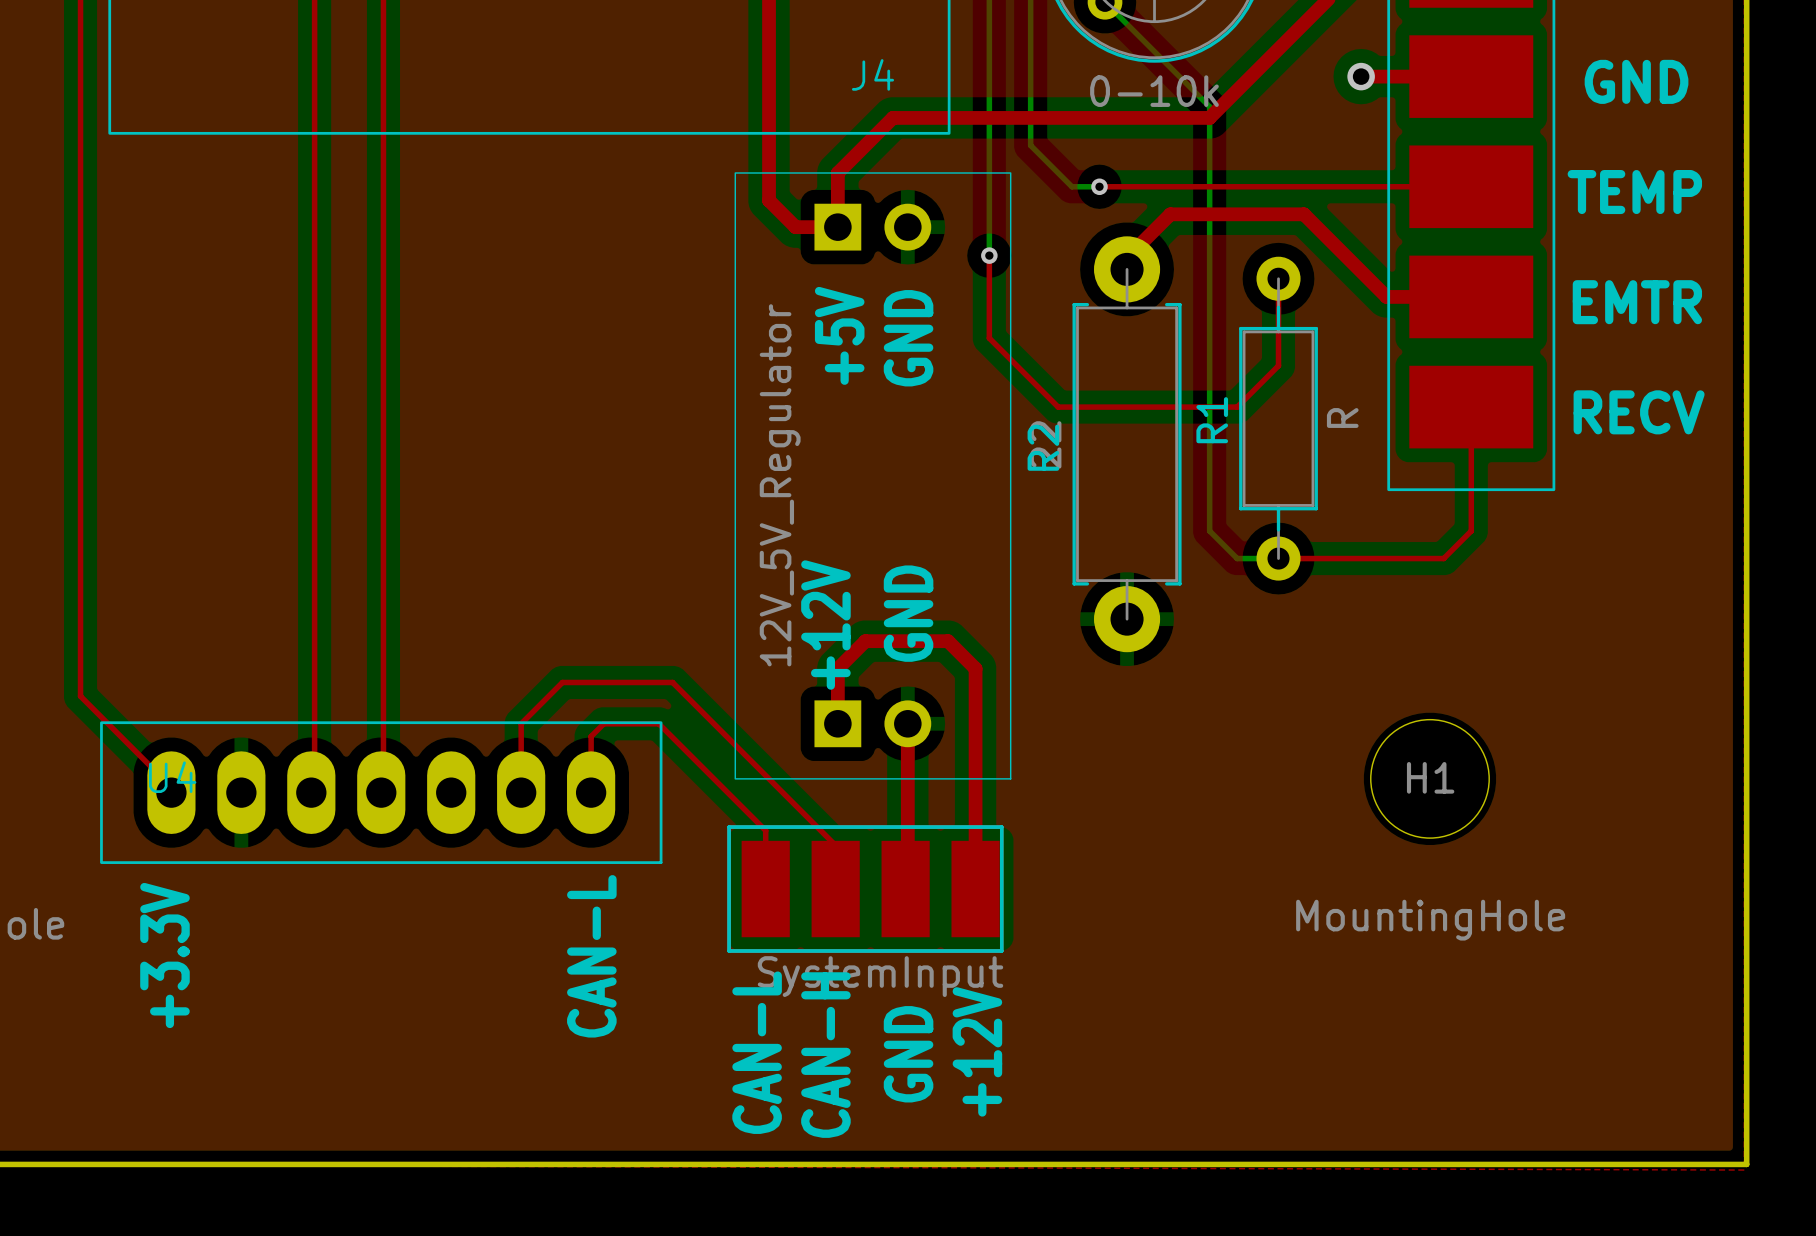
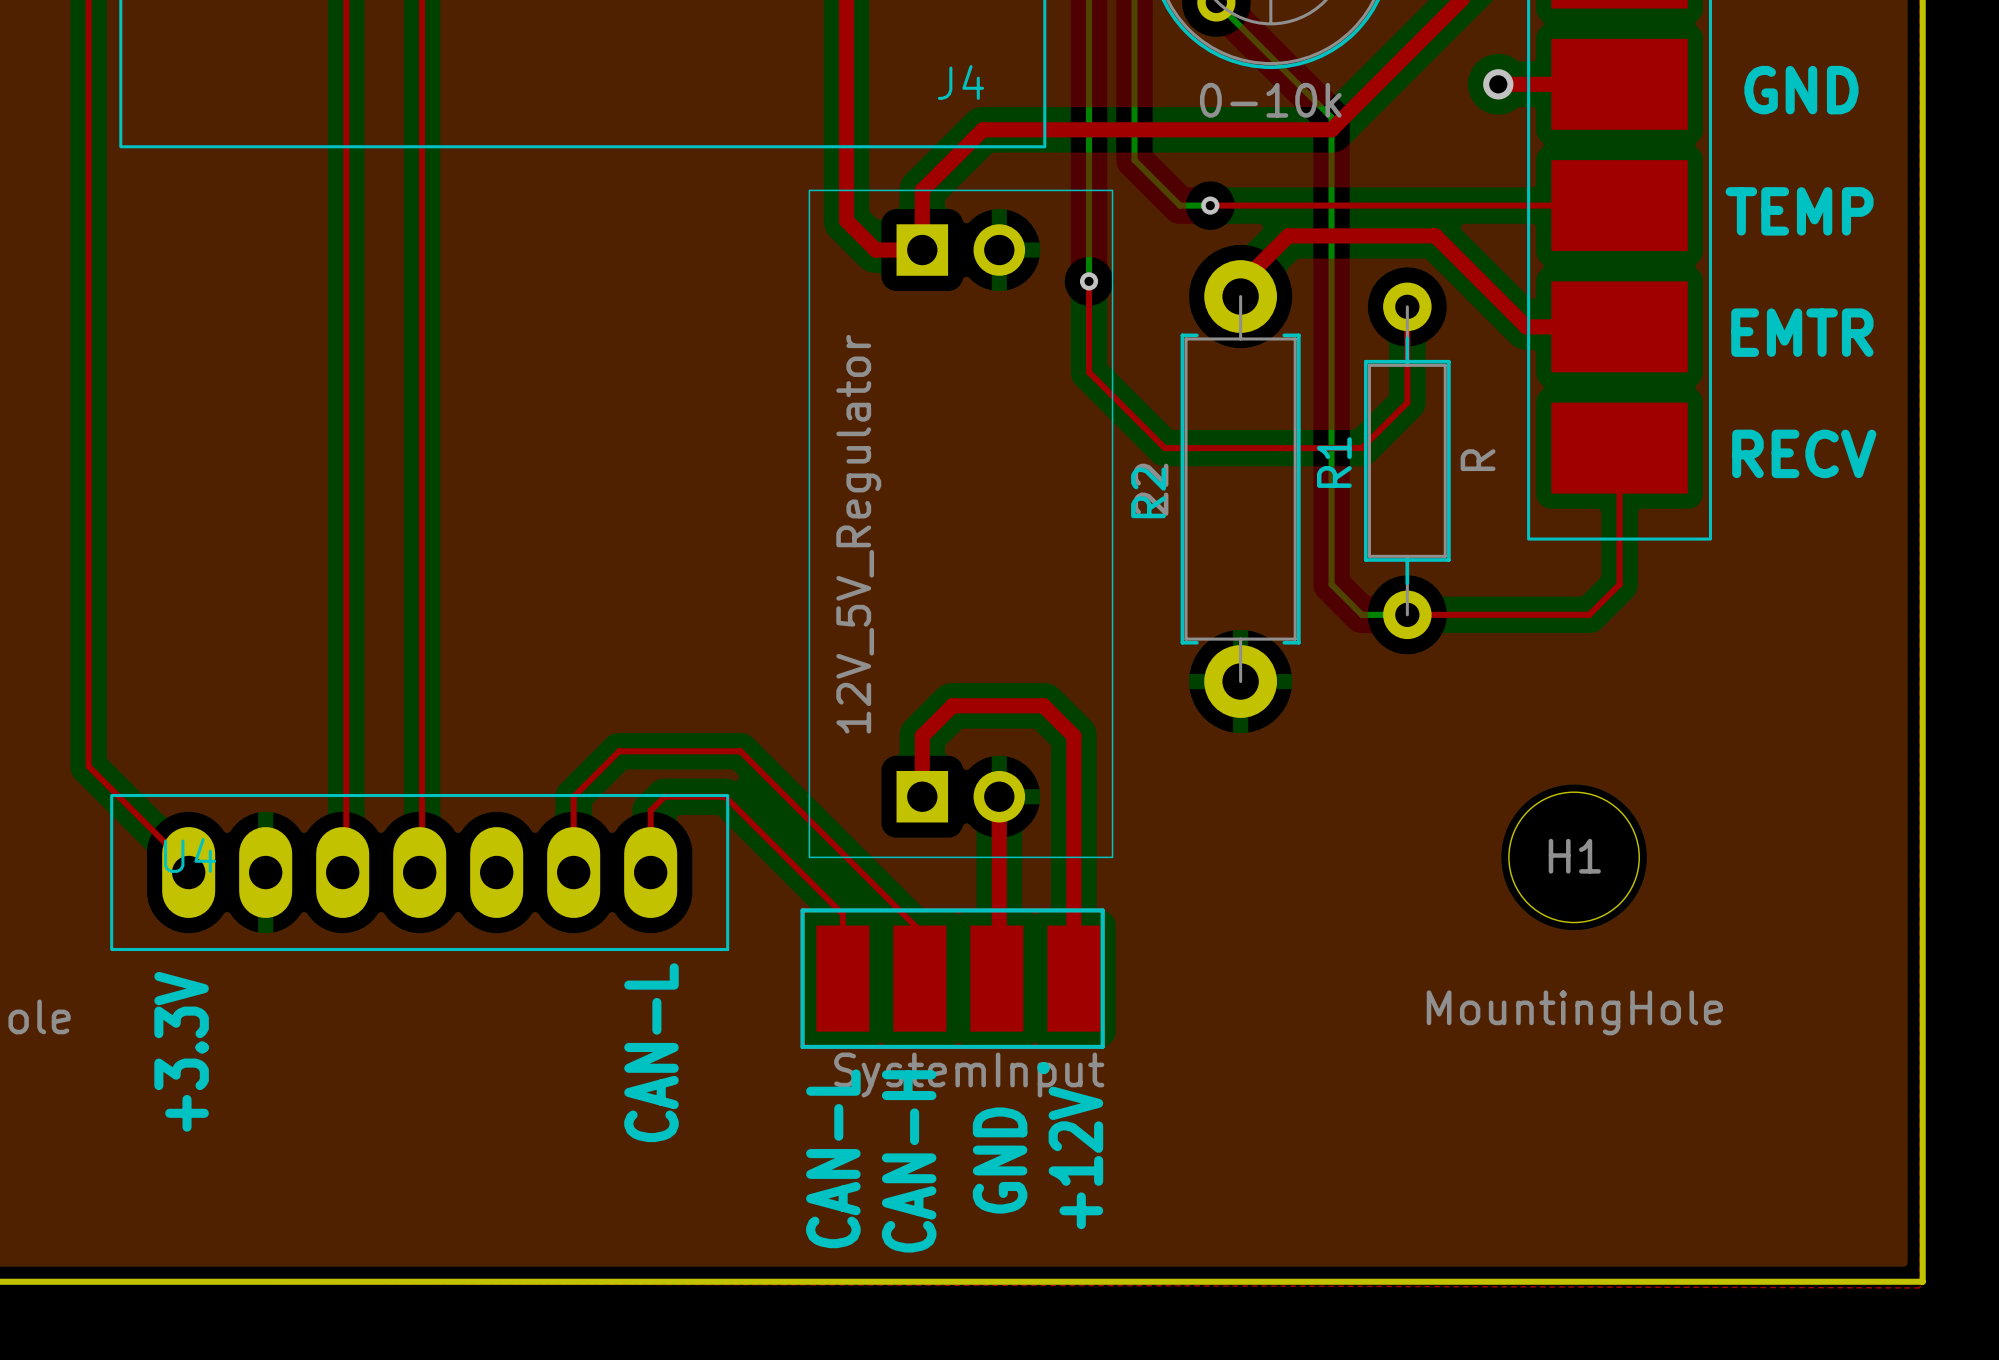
text: +5V (839, 335) -> none
text: GND (908, 338) -> none
text: GND (908, 613) -> none
text: +12V (825, 625) -> none
part footprint: [727, 825, 1004, 953] -> [800, 908, 1105, 1075]

